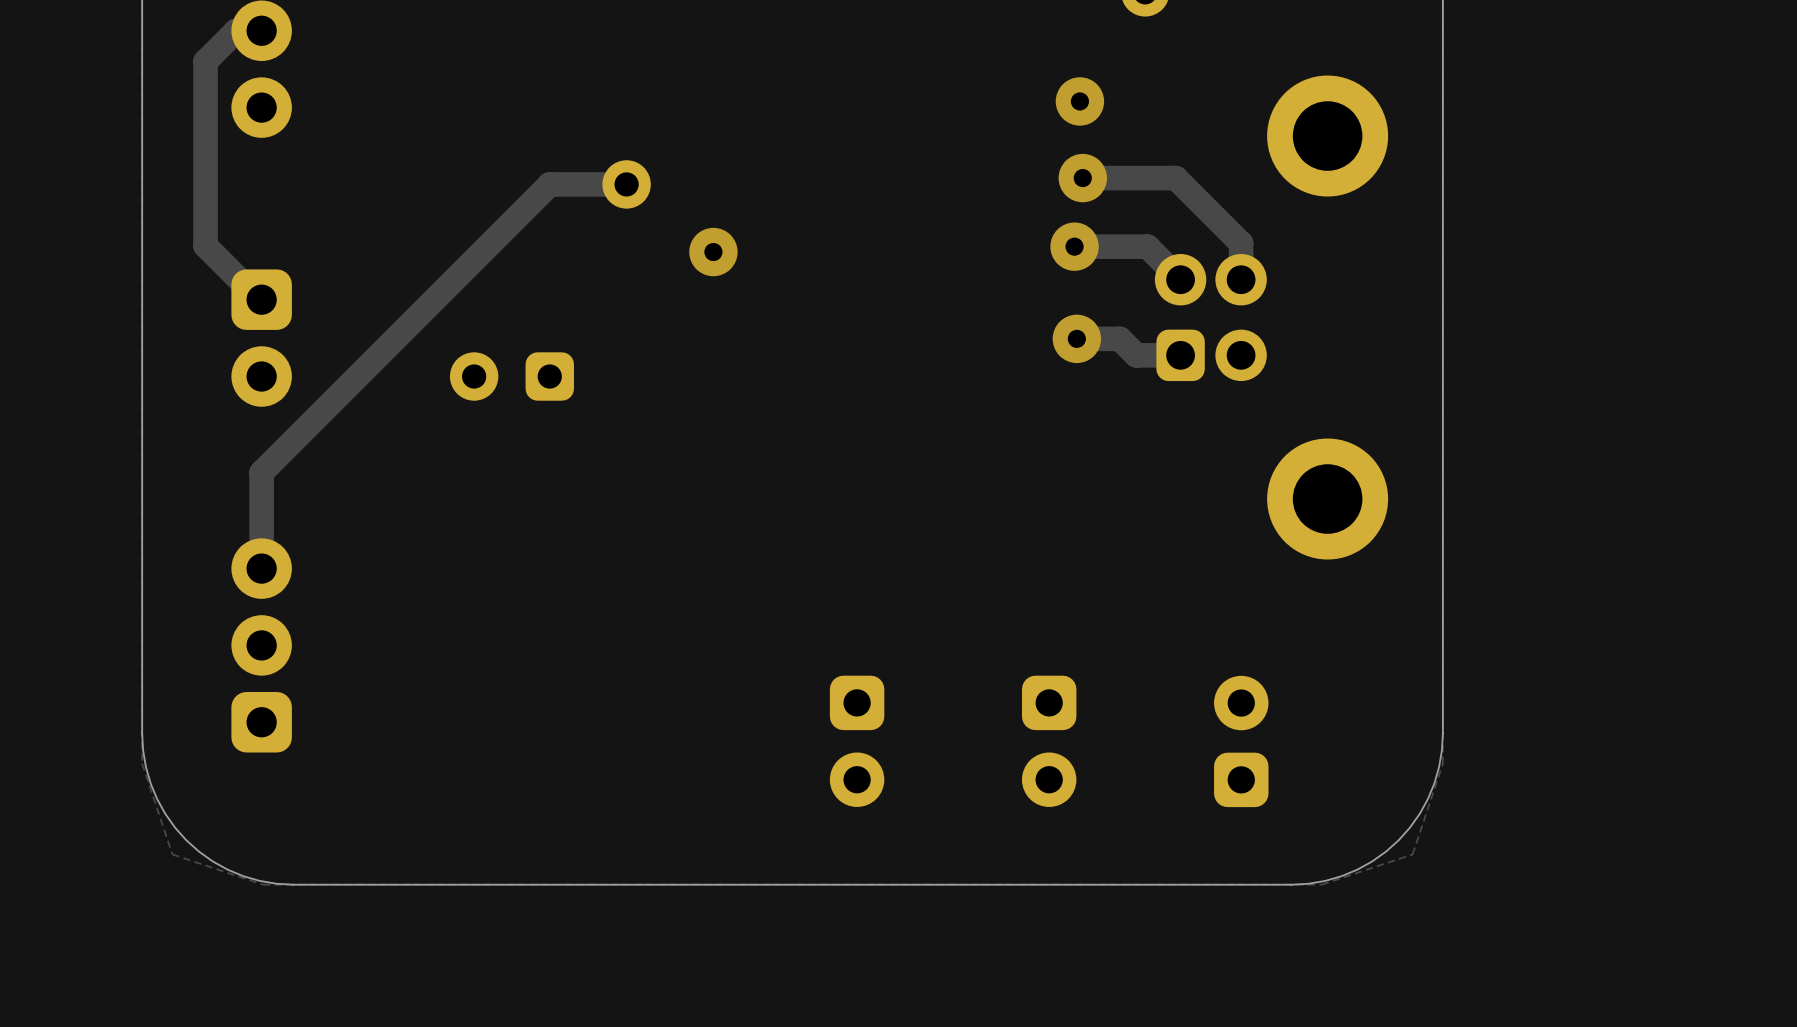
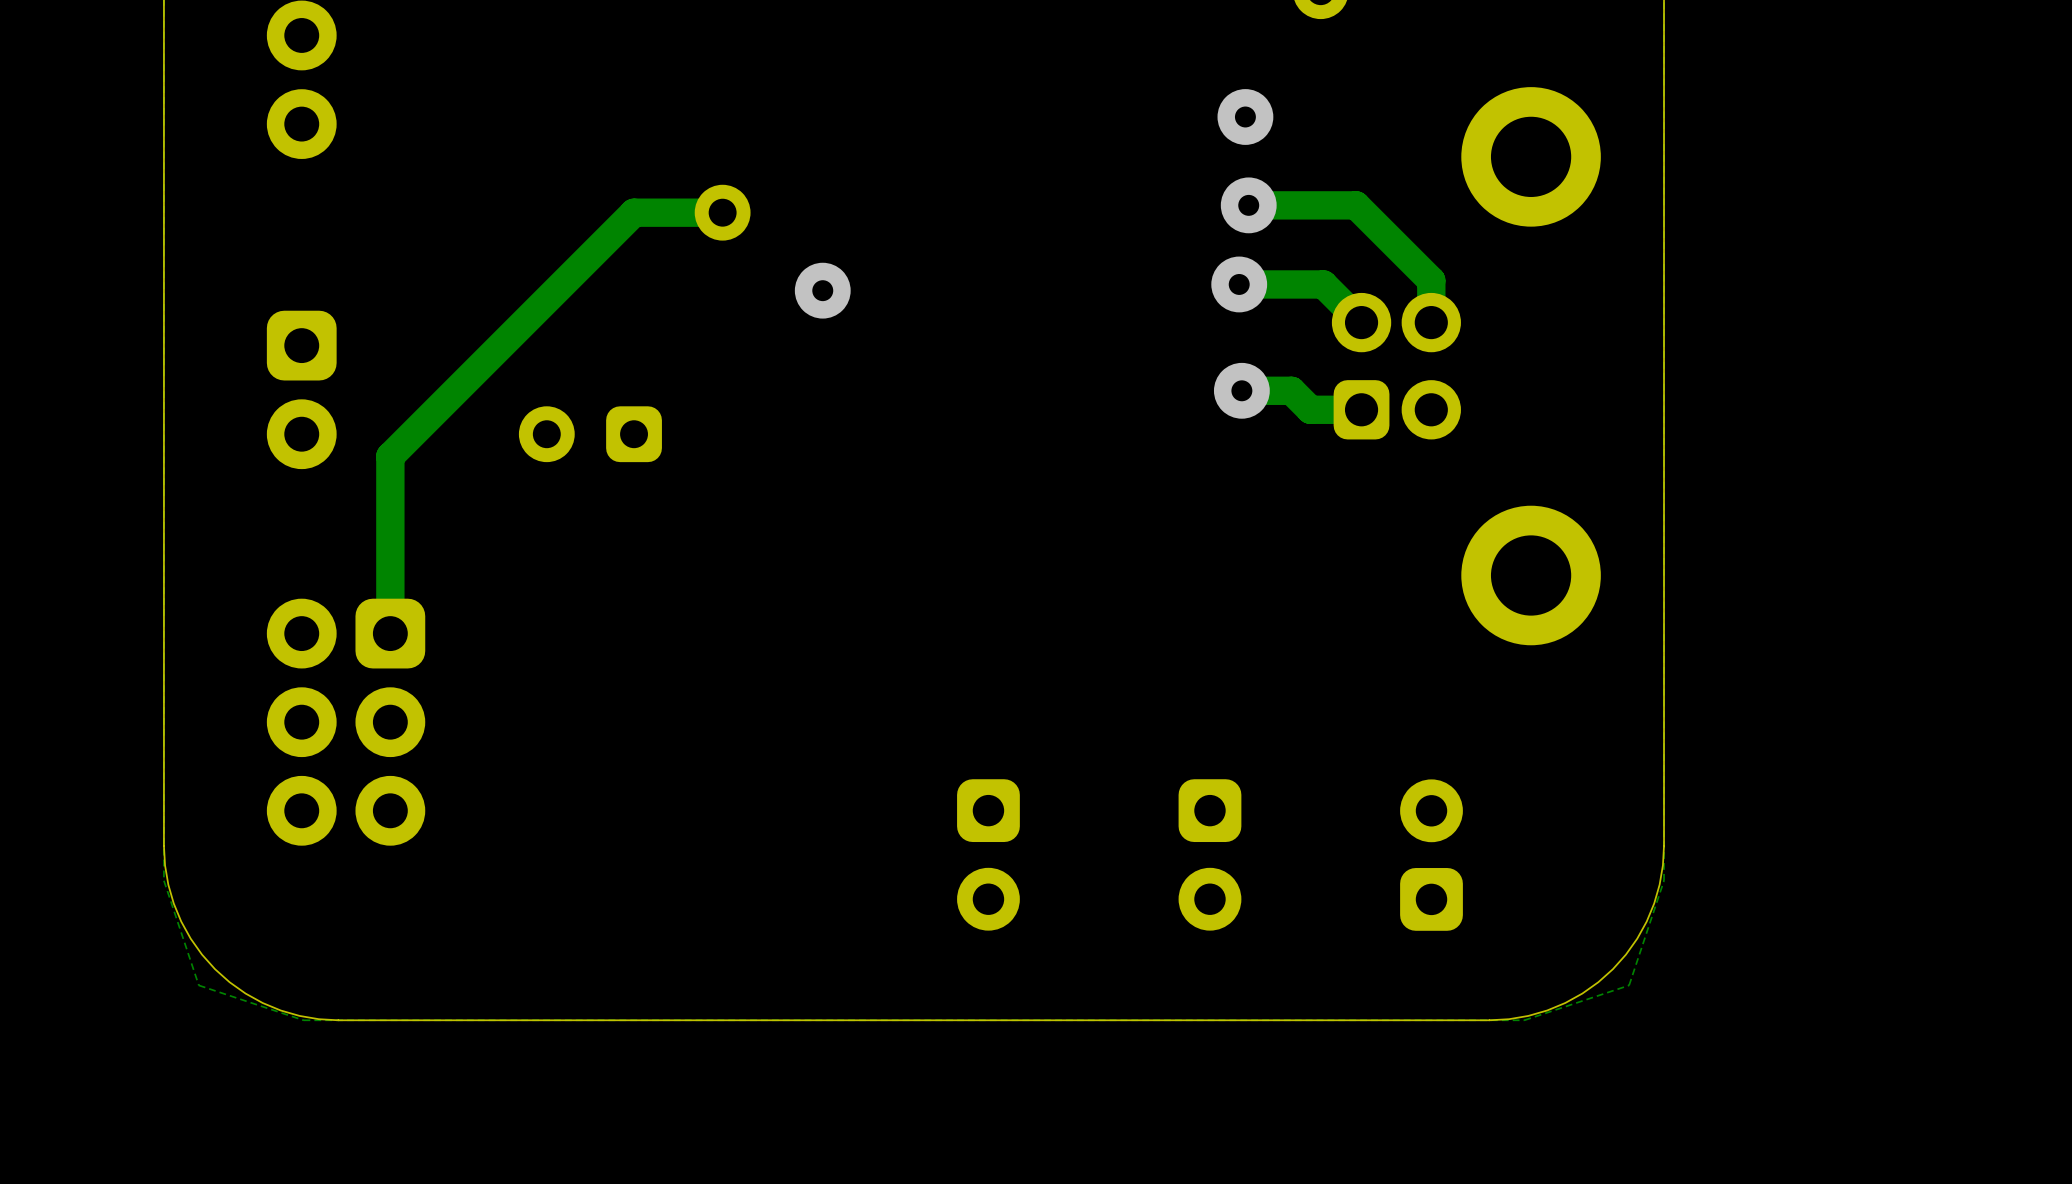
track: (261, 30) (236, 30) (205, 61) (205, 245) (259, 299) (261, 299) -> none
track: (338, 395) (261, 472) (261, 568) -> (390, 456) (390, 633)
part: none -> (346, 722)
part: (261, 645) -> none

